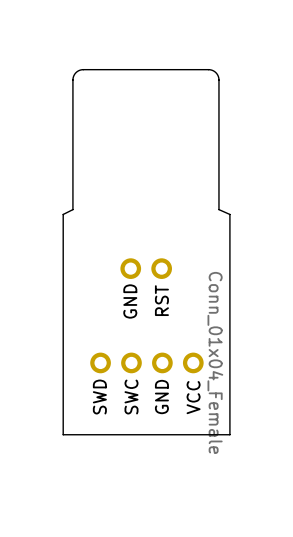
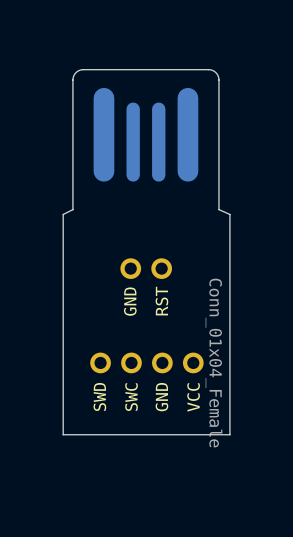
part: none -> (145, 134)

